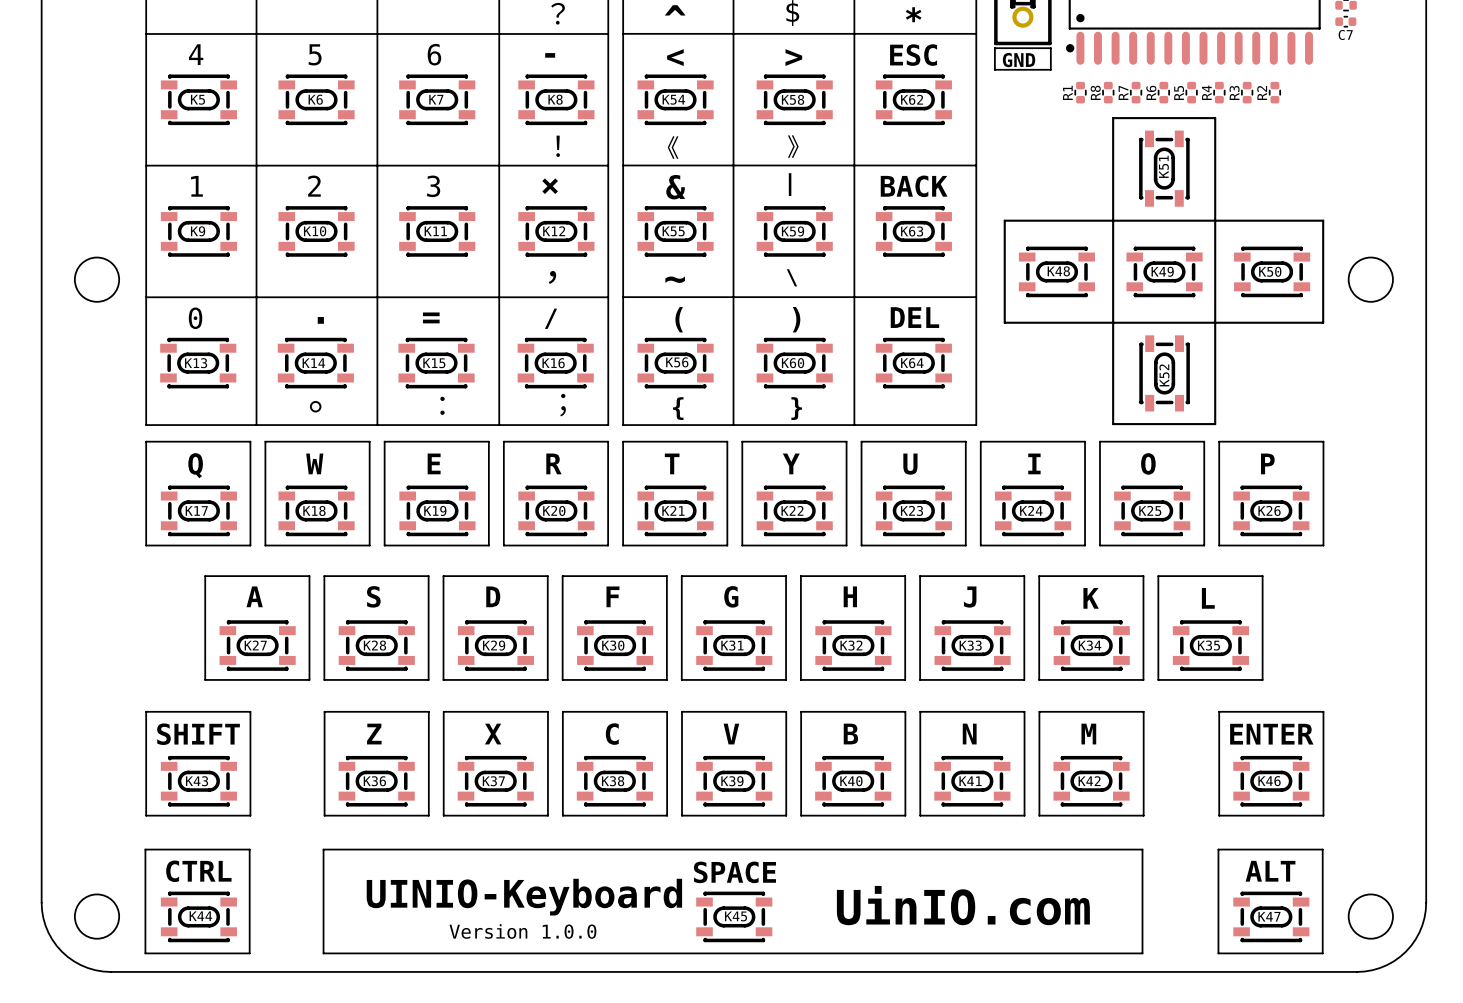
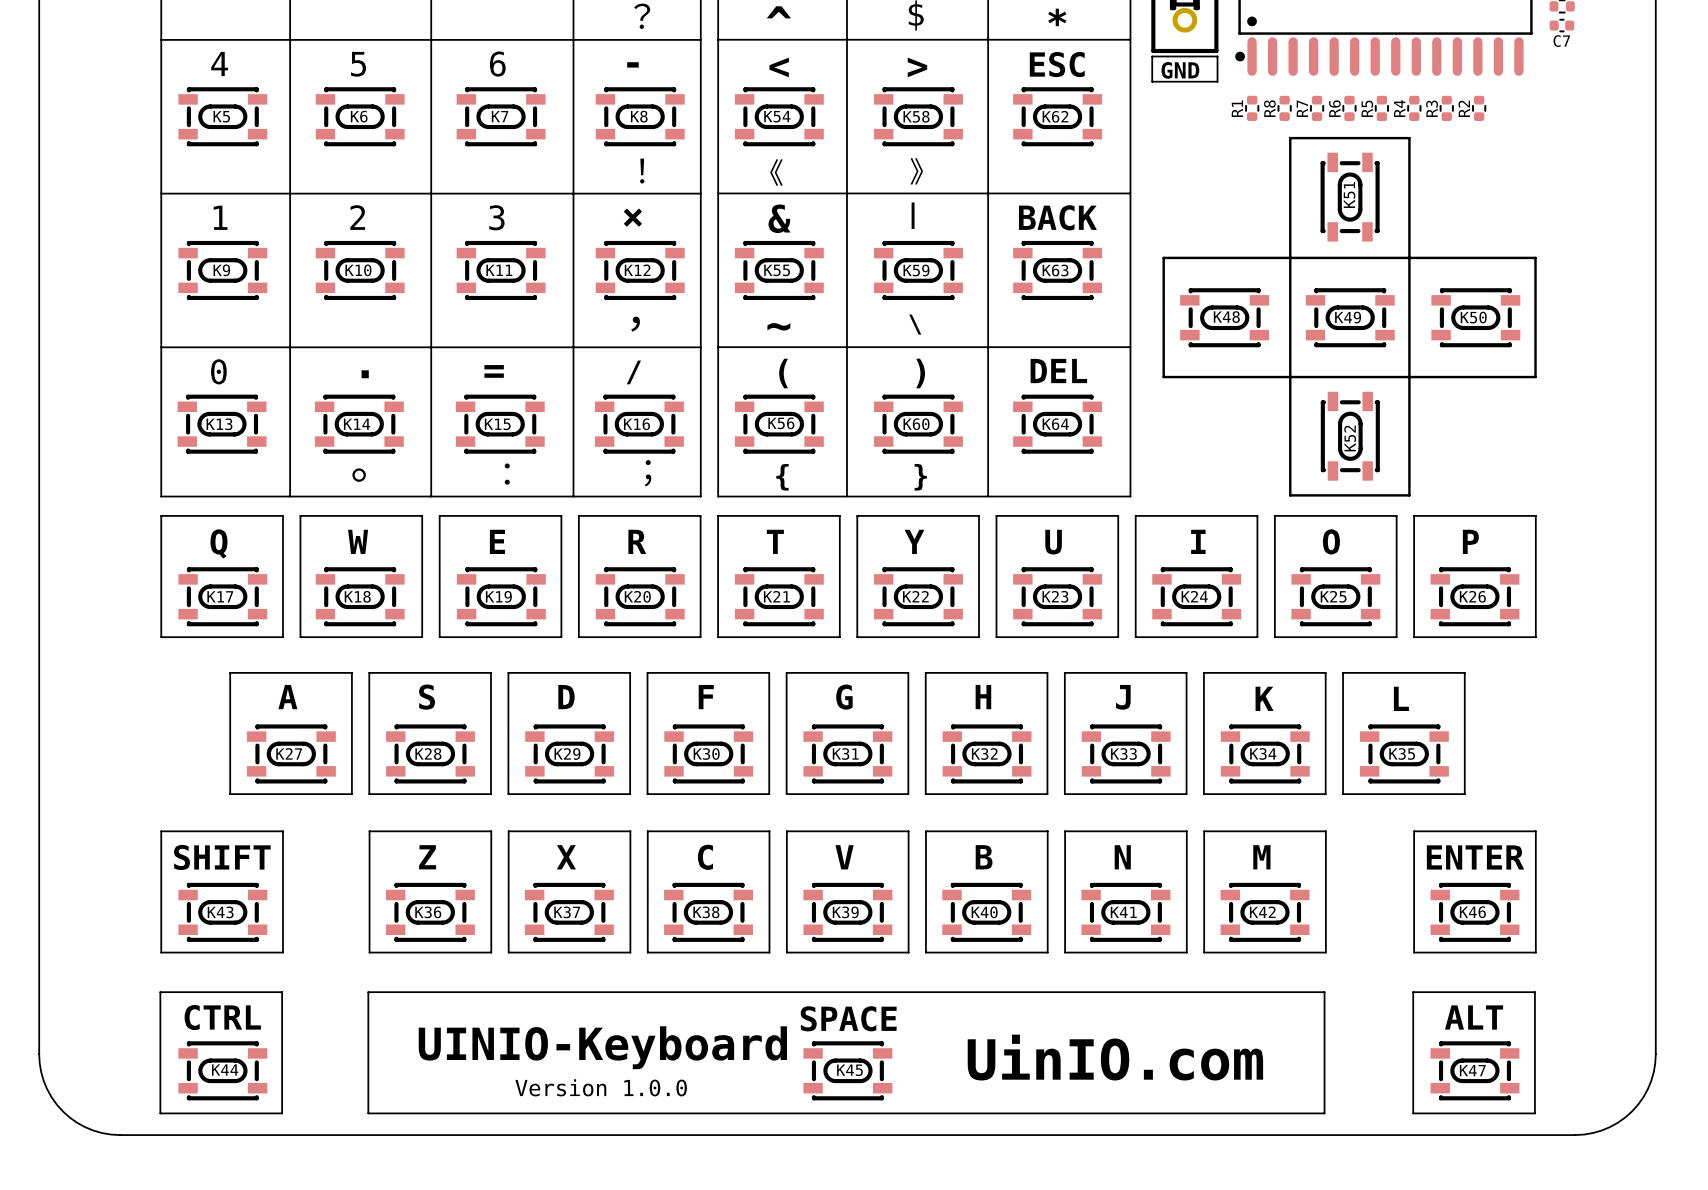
round board edge: [74, 256, 120, 303] -> none
round board edge: [1347, 256, 1394, 303] -> none
round board edge: [74, 893, 120, 940] -> none
round board edge: [1347, 893, 1394, 940] -> none

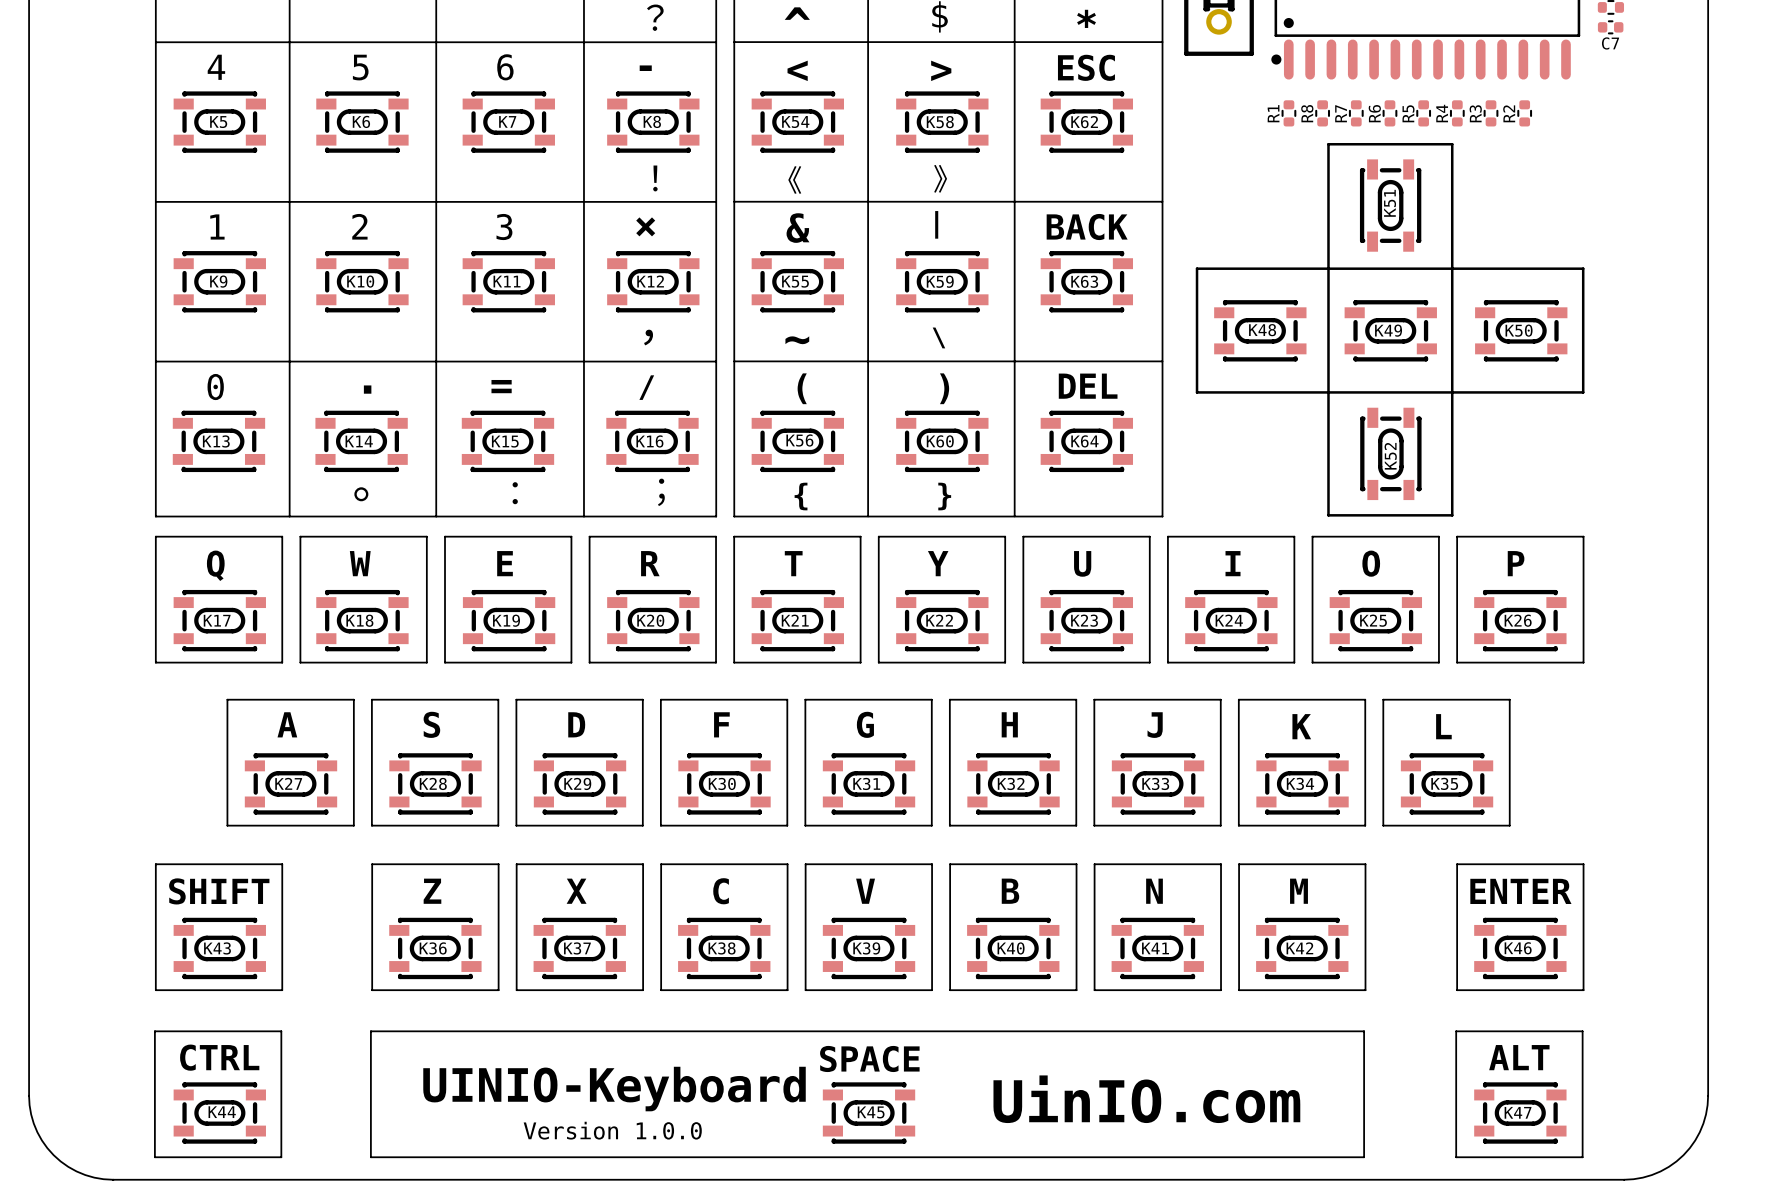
line: (1152, 56) (1217, 56) (1217, 81) (1152, 81) (1152, 56) -> none
text: GND (1180, 70) -> none

